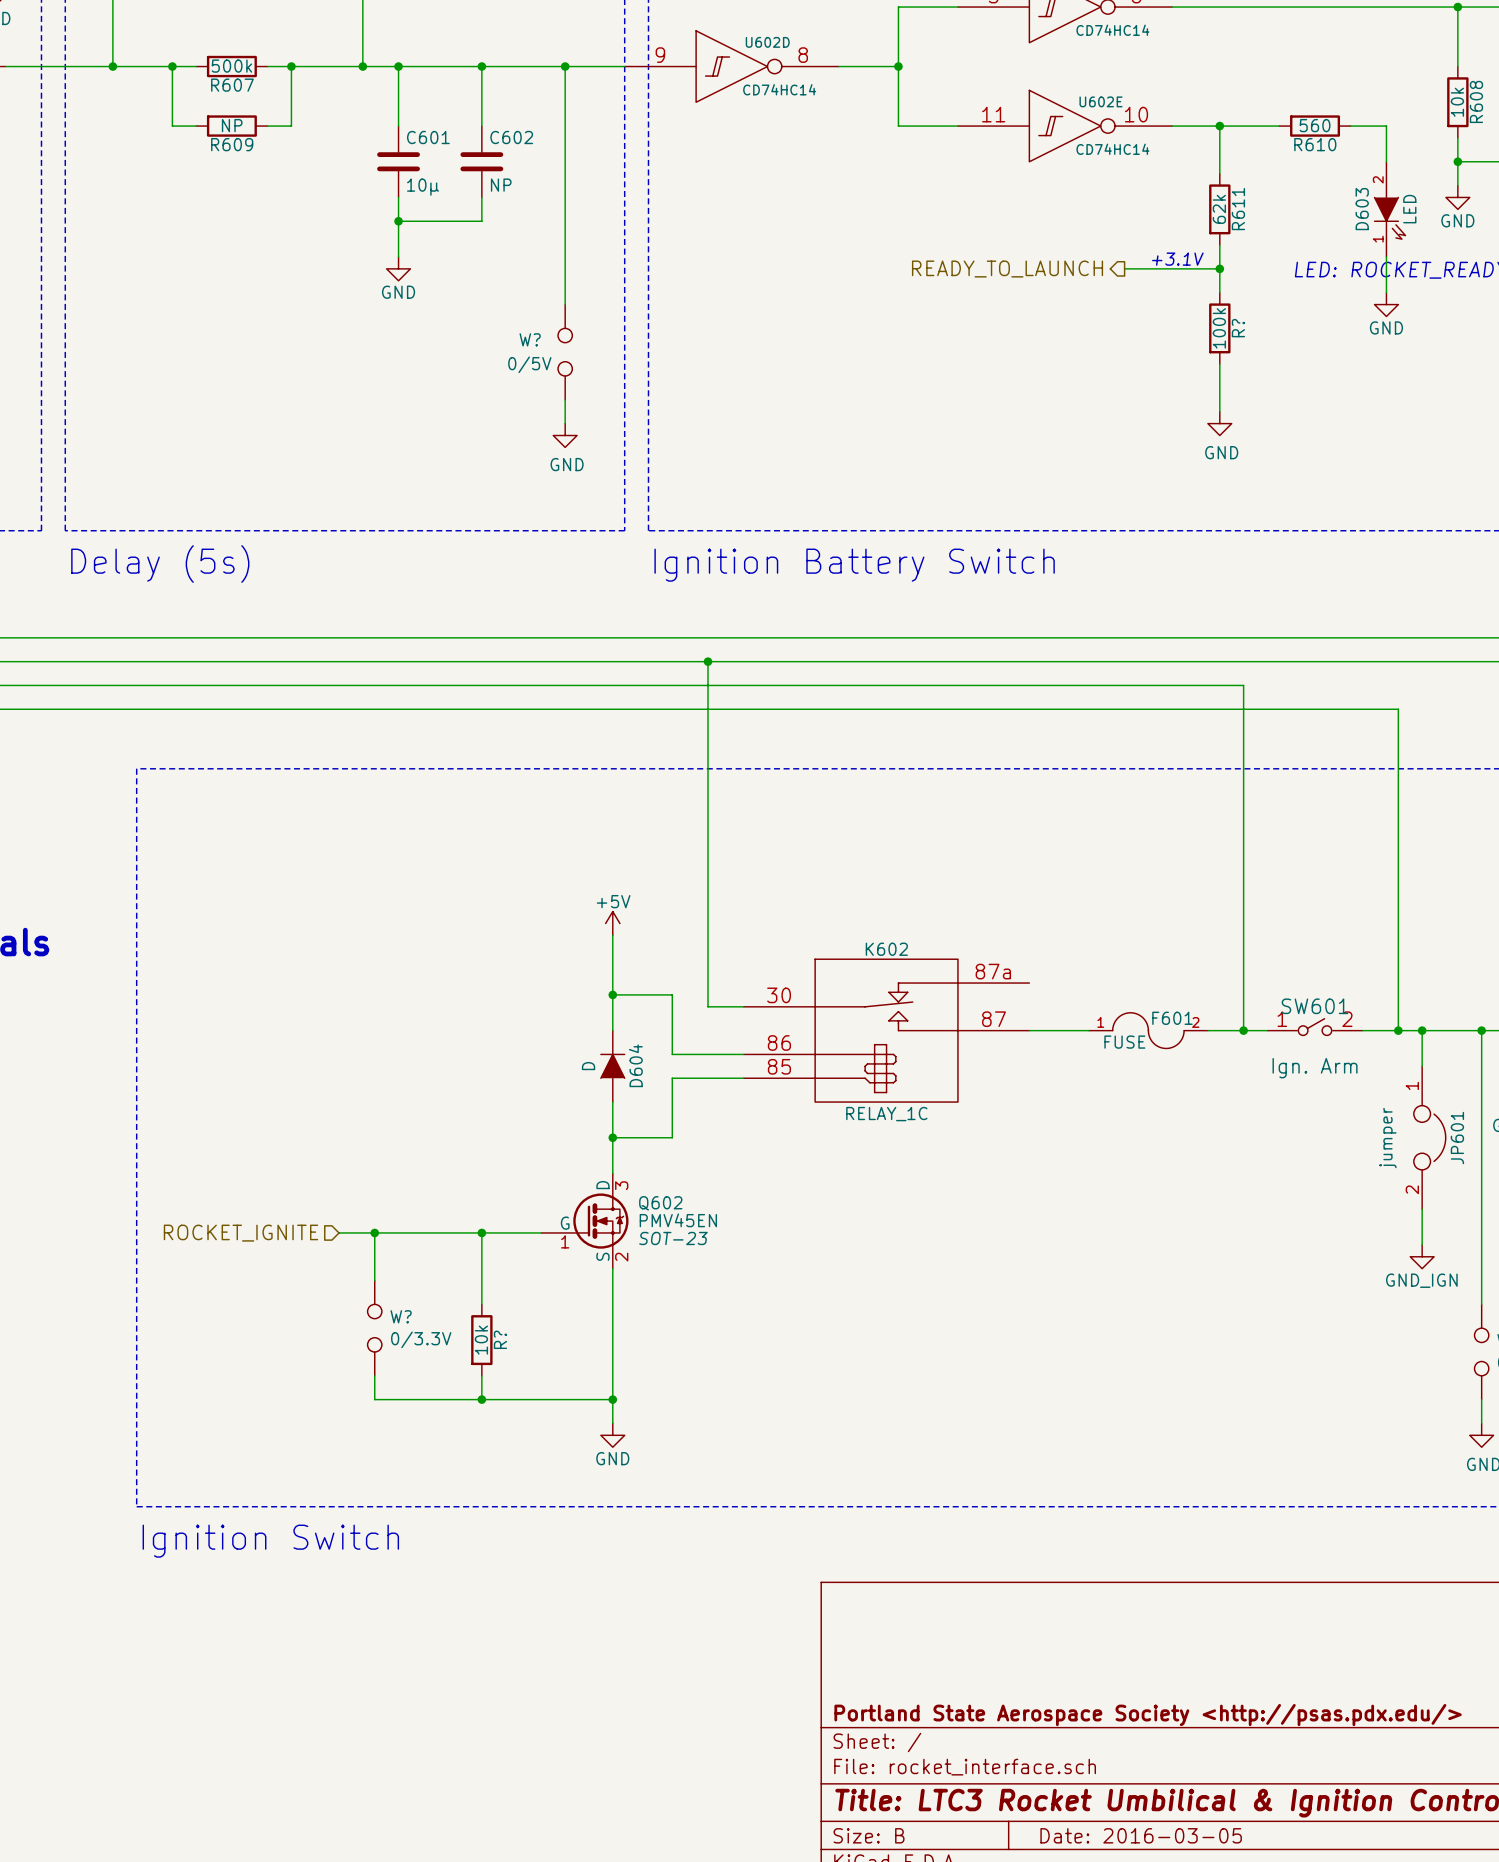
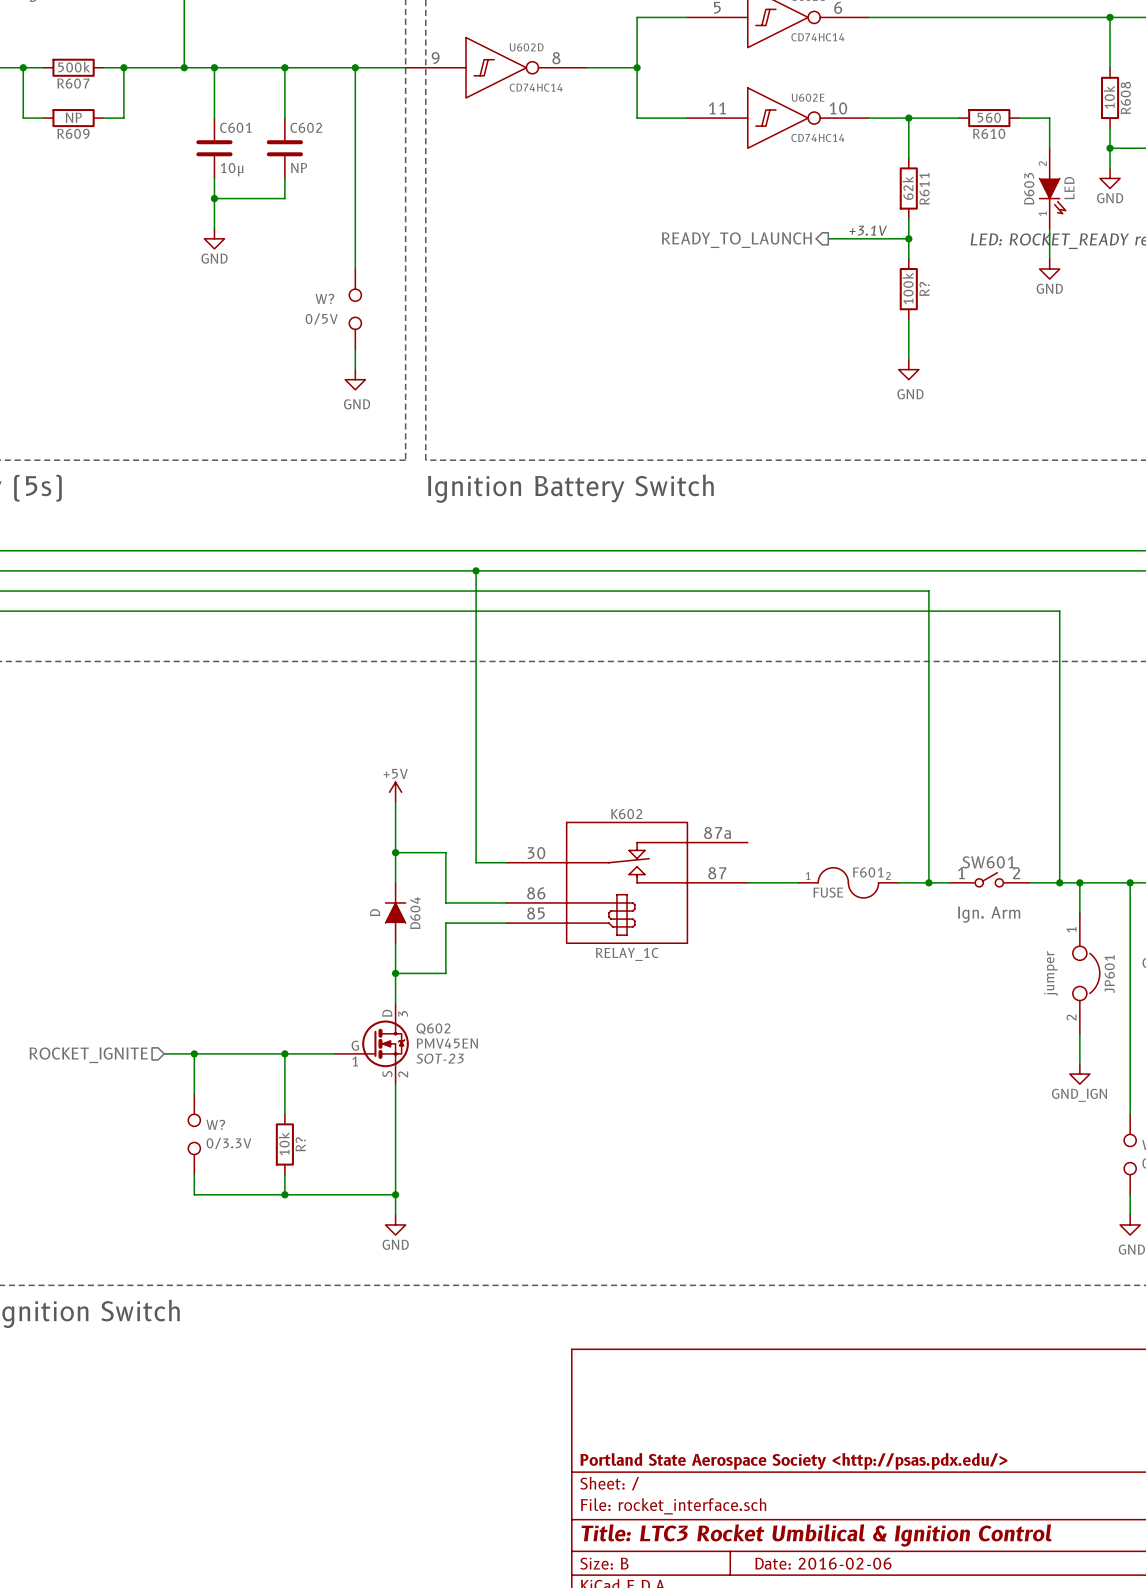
title block: Date: 2016-03-05 (1141, 1835) -> Date: 2016-02-06 (823, 1563)

